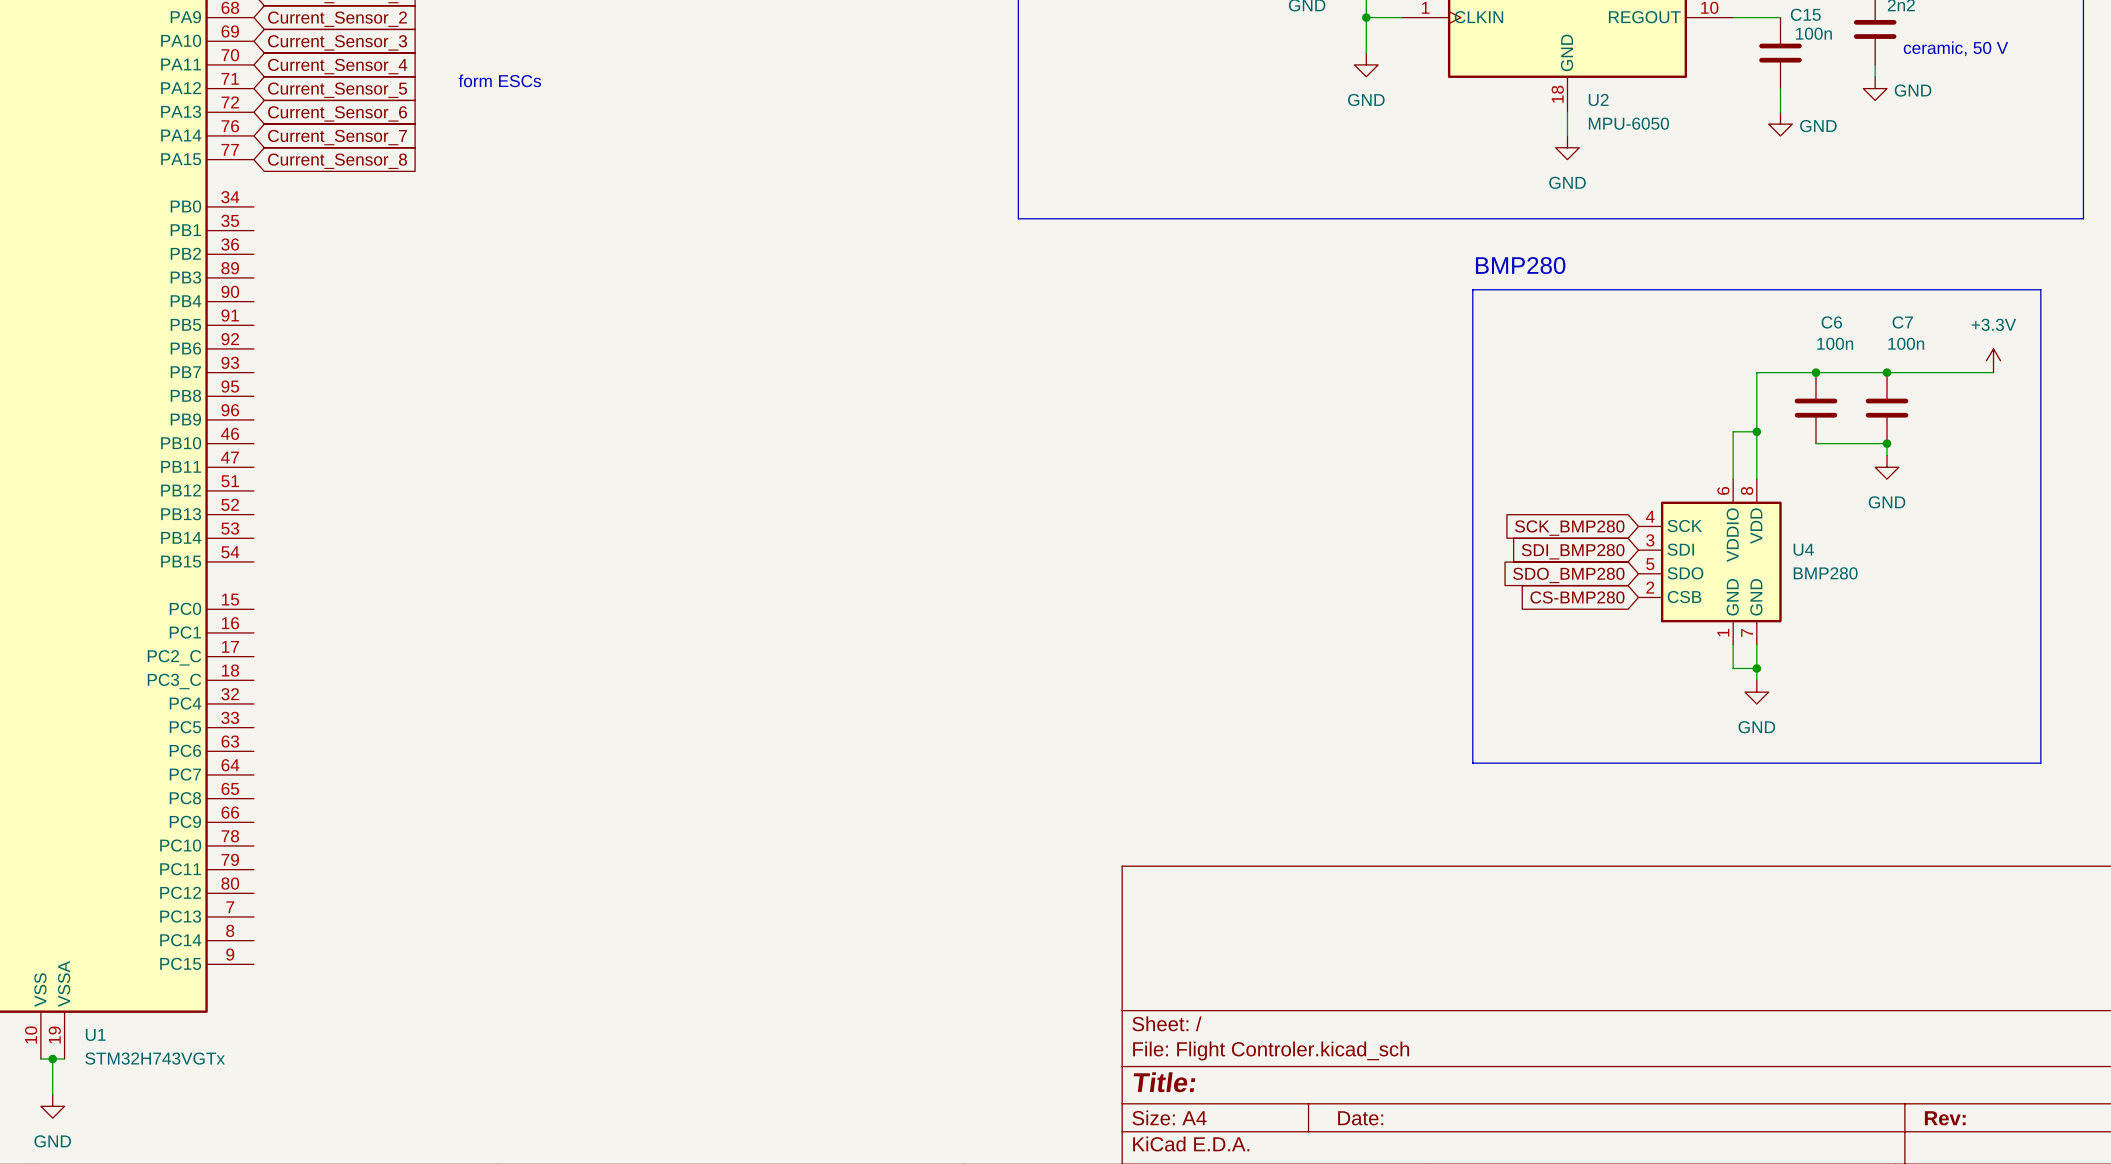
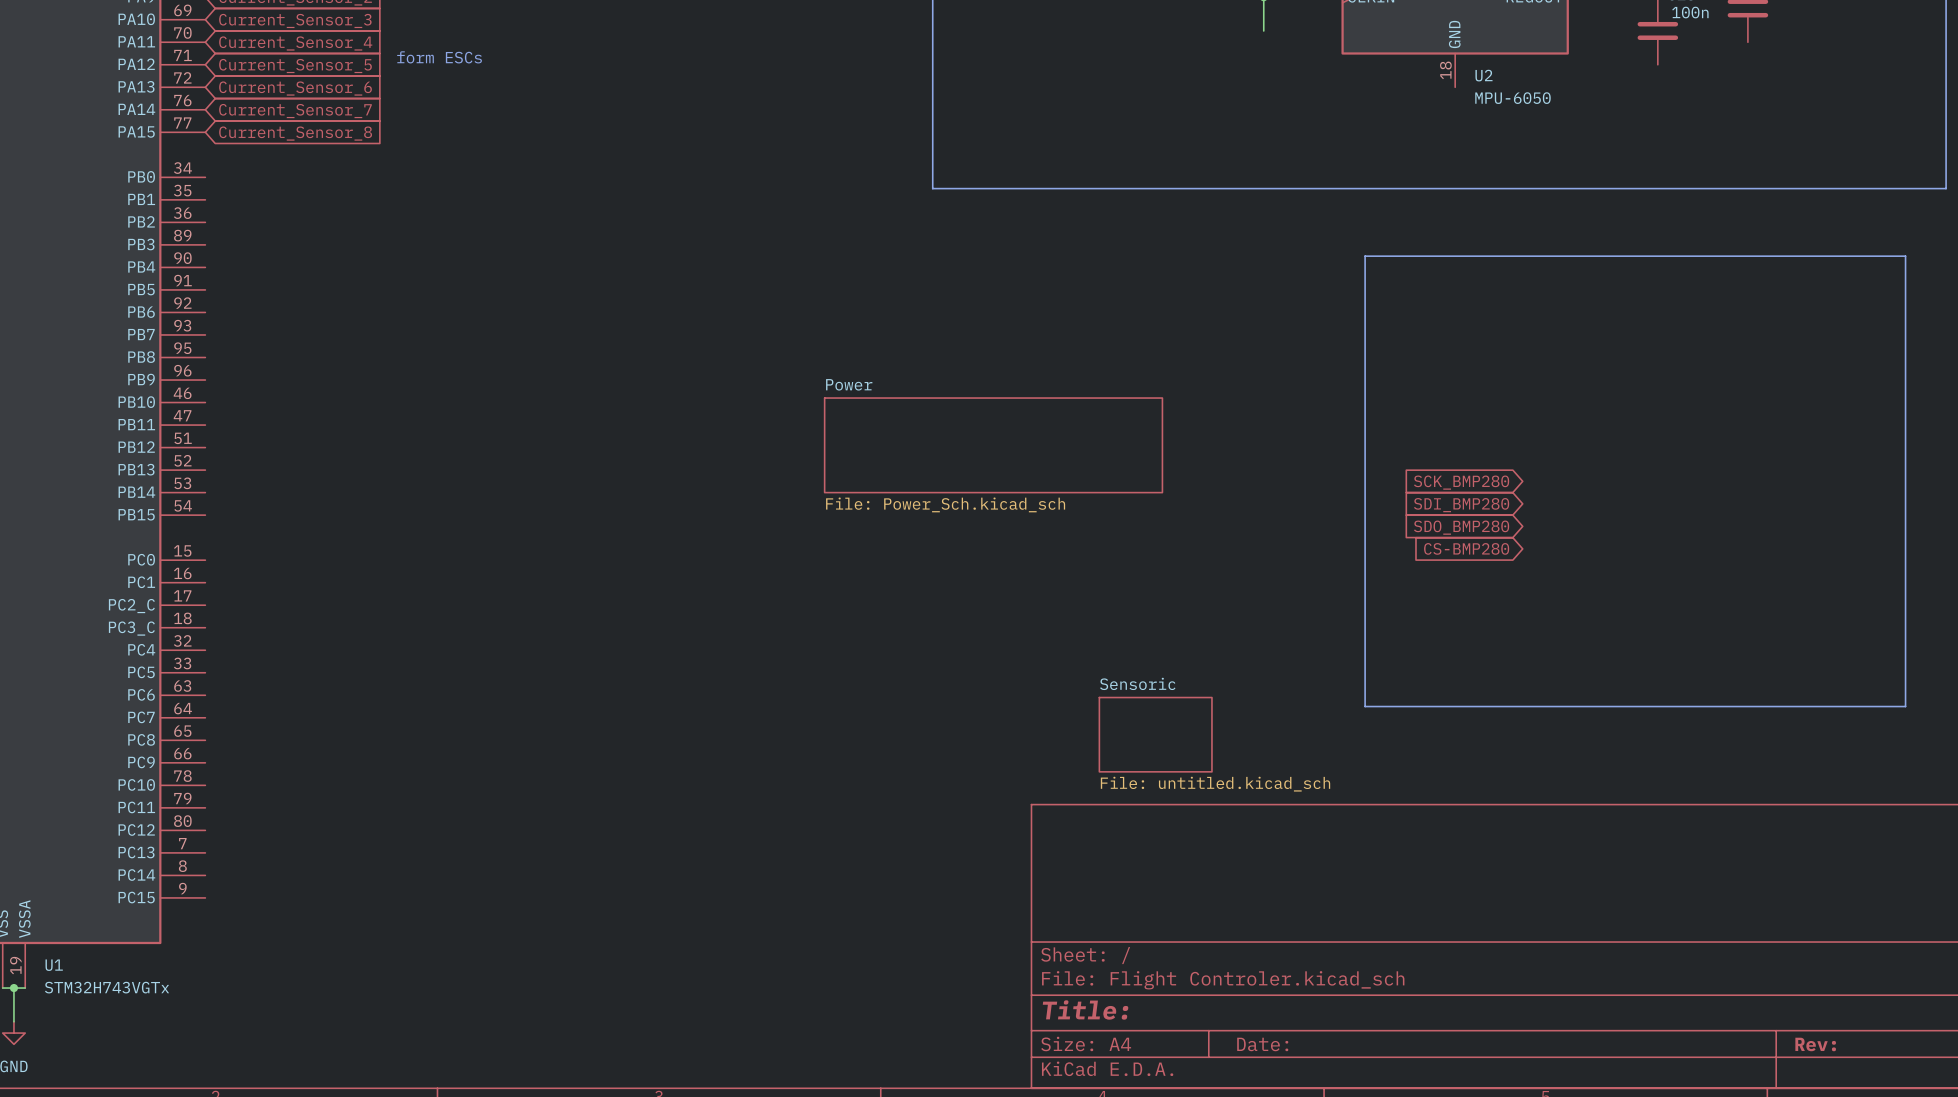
text: ceramic, 50 V (1955, 48) -> none
power symbol: GND (1366, 64) -> none
wire: (1875, 64) (1875, 76) -> none
wire: (1780, 88) (1780, 112) -> none
power symbol: GND (1875, 88) -> none
wire: (1567, 112) (1567, 135) -> none
power symbol: GND (1780, 124) -> none
power symbol: GND (1567, 147) -> none
text: BMP280 (1520, 265) -> none
power symbol: +3.3V (1993, 360) -> none
junction: (1815, 372) -> none
junction: (1887, 372) -> none
wire: (1993, 372) (1756, 372) (1756, 479) -> none
C6: 100n (1815, 408) -> none
C7: 100n (1887, 408) -> none
wire: (1756, 431) (1733, 431) (1733, 479) -> none
junction: (1756, 431) -> none
wire: (1815, 443) (1887, 443) (1887, 455) -> none
junction: (1887, 443) -> none
power symbol: GND (1887, 467) -> none
sheet Power: none -> File: Power_Sch.kicad_sch (993, 445)
U4: BMP280 (1710, 561) -> none
wire: (1733, 644) (1733, 668) (1756, 668) -> none
wire: (1756, 644) (1756, 680) -> none
junction: (1756, 668) -> none
power symbol: GND (1756, 692) -> none
sheet Sensoric: none -> File: untitled.kicad_sch (1155, 734)

